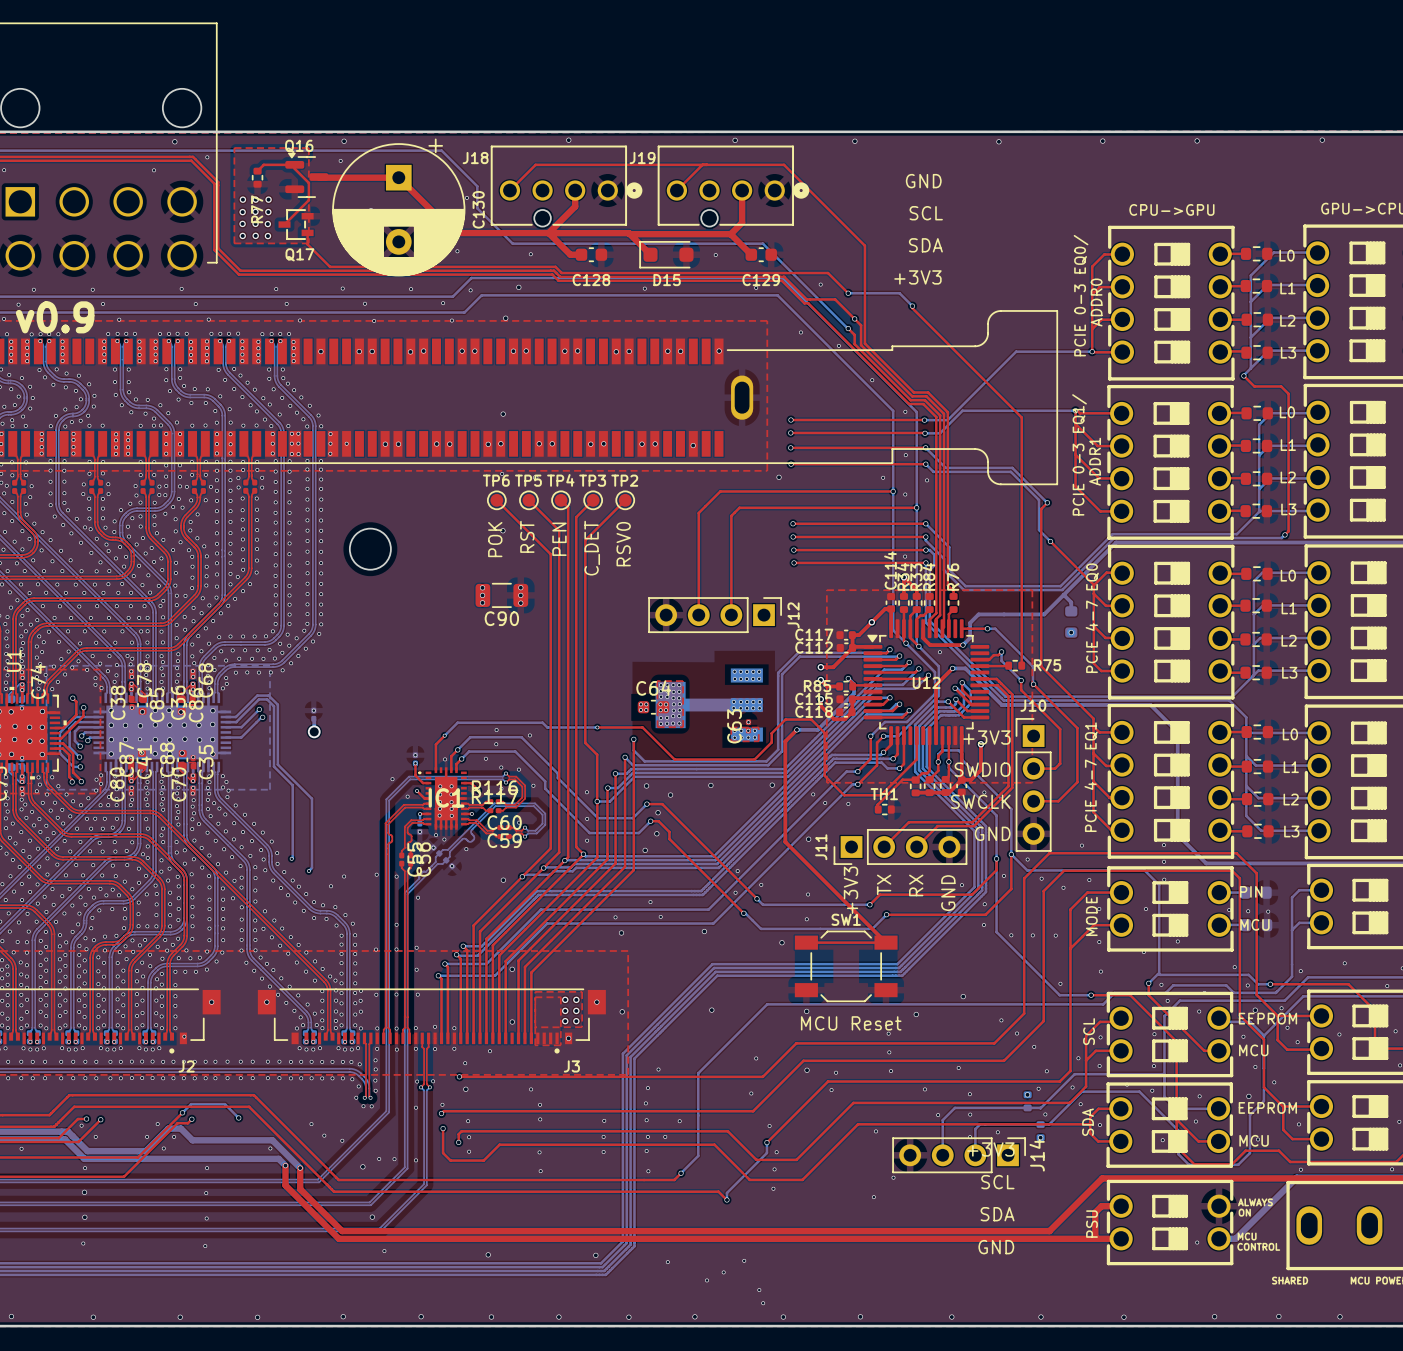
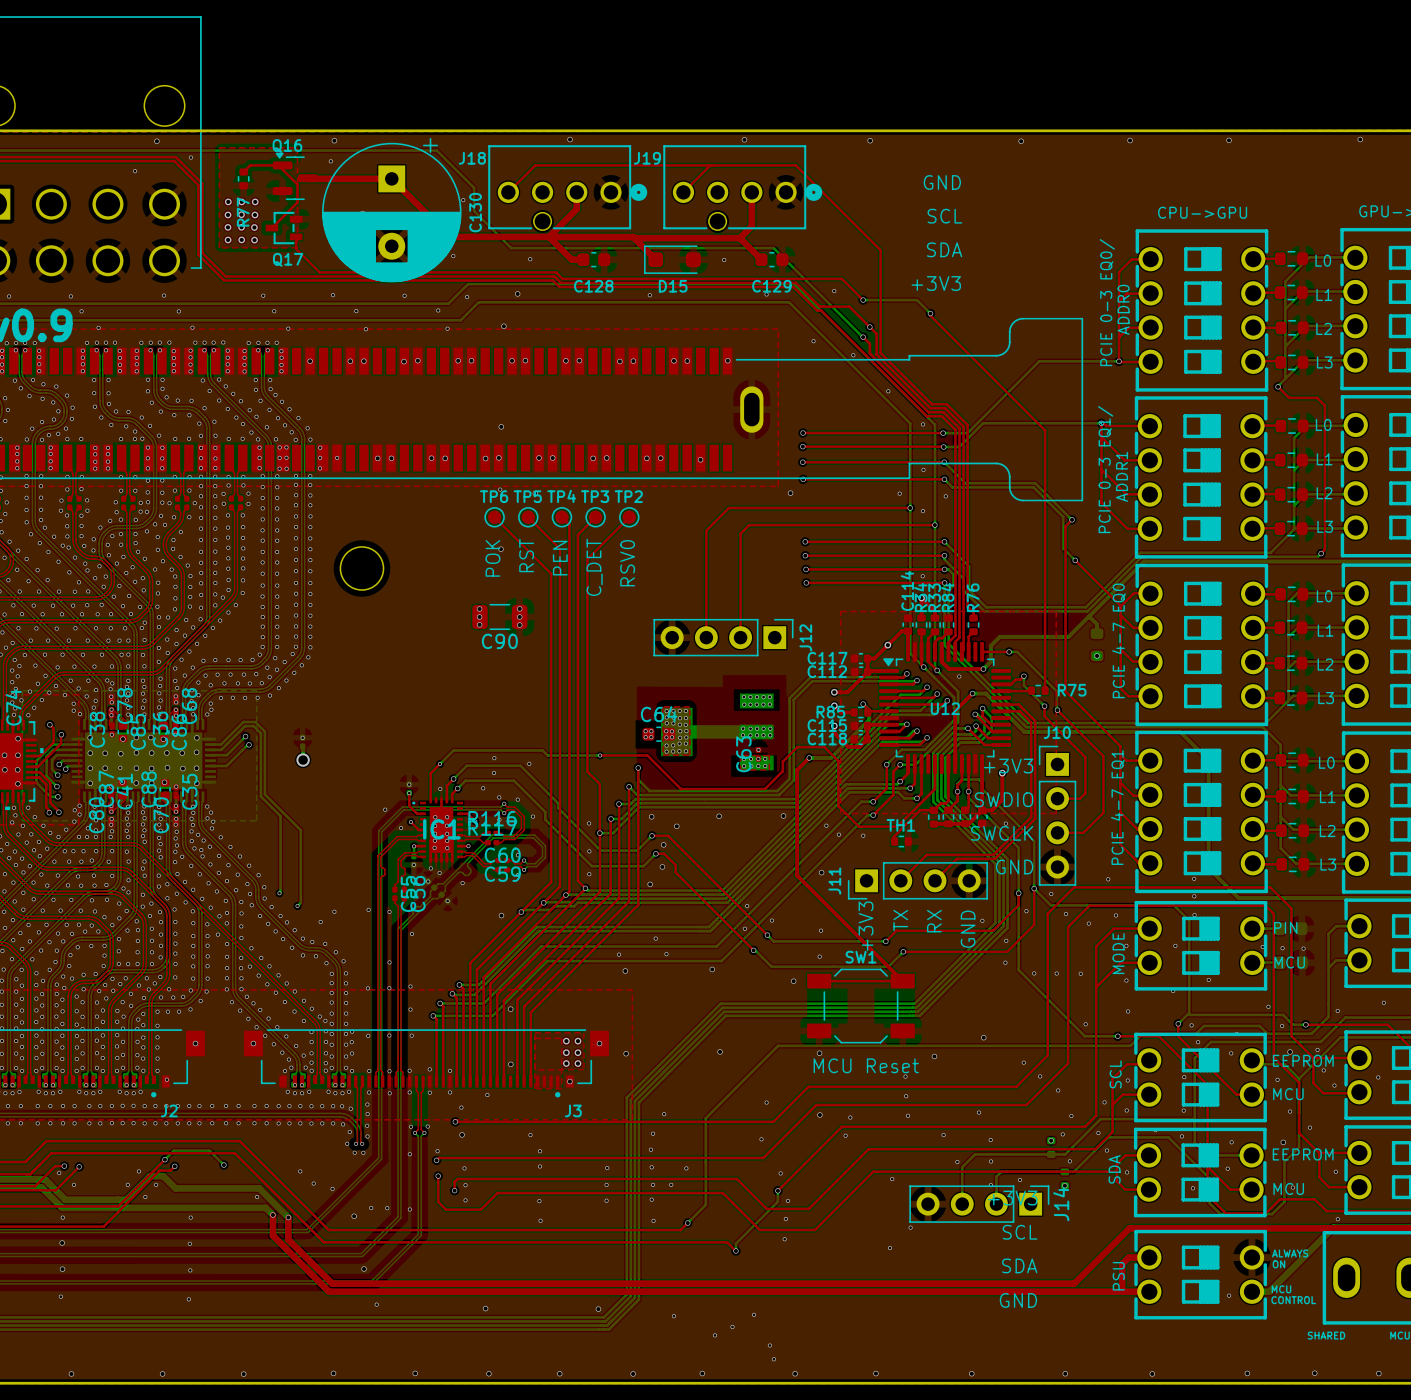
via: none -> (201, 850)

